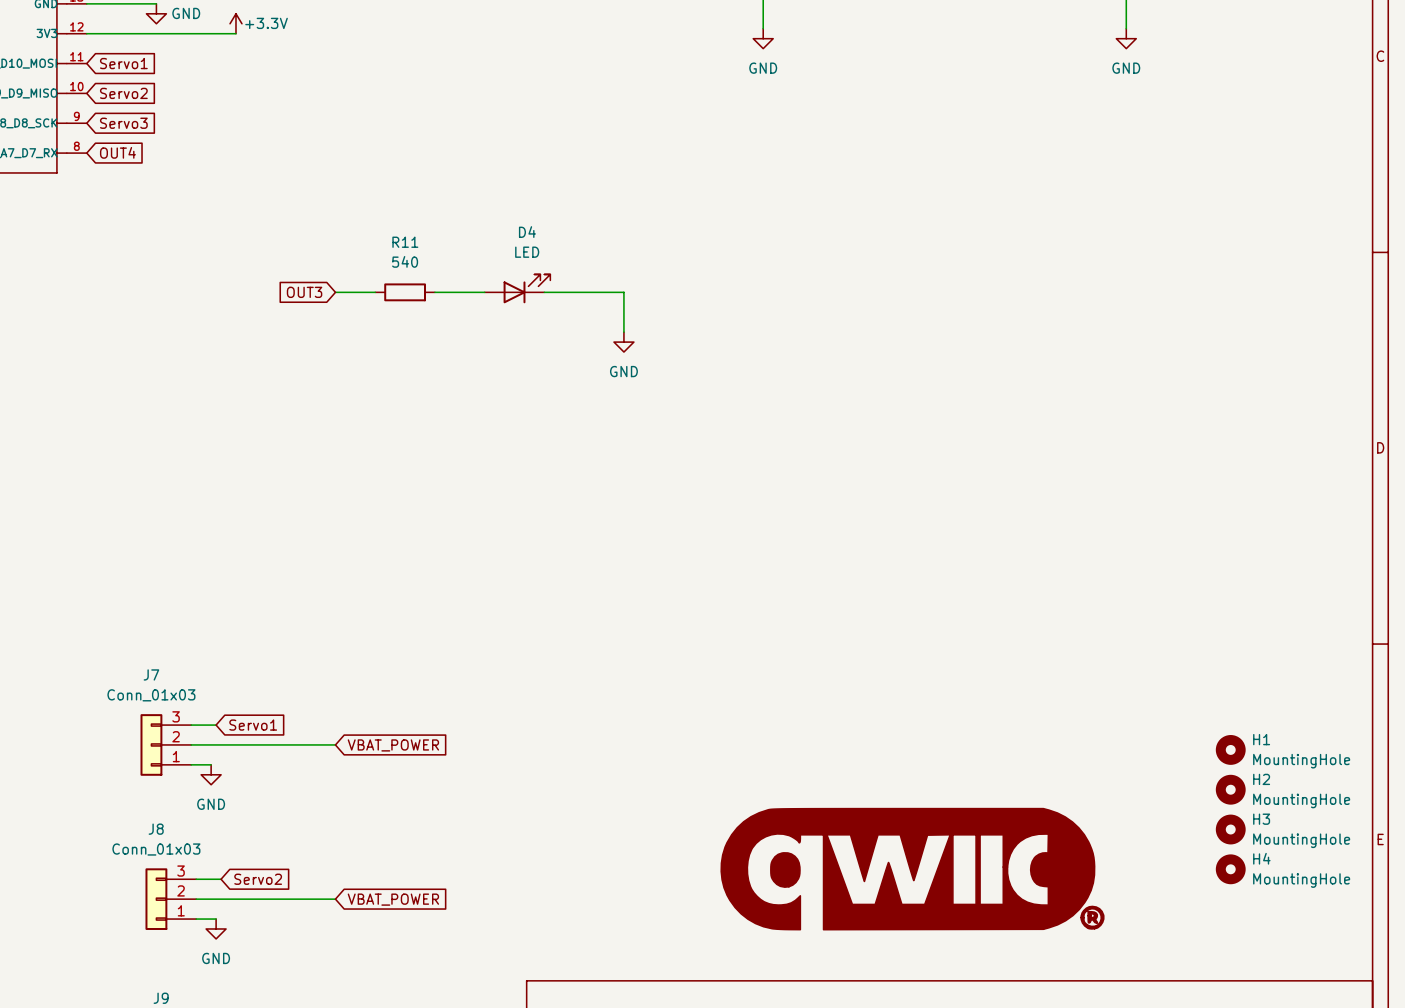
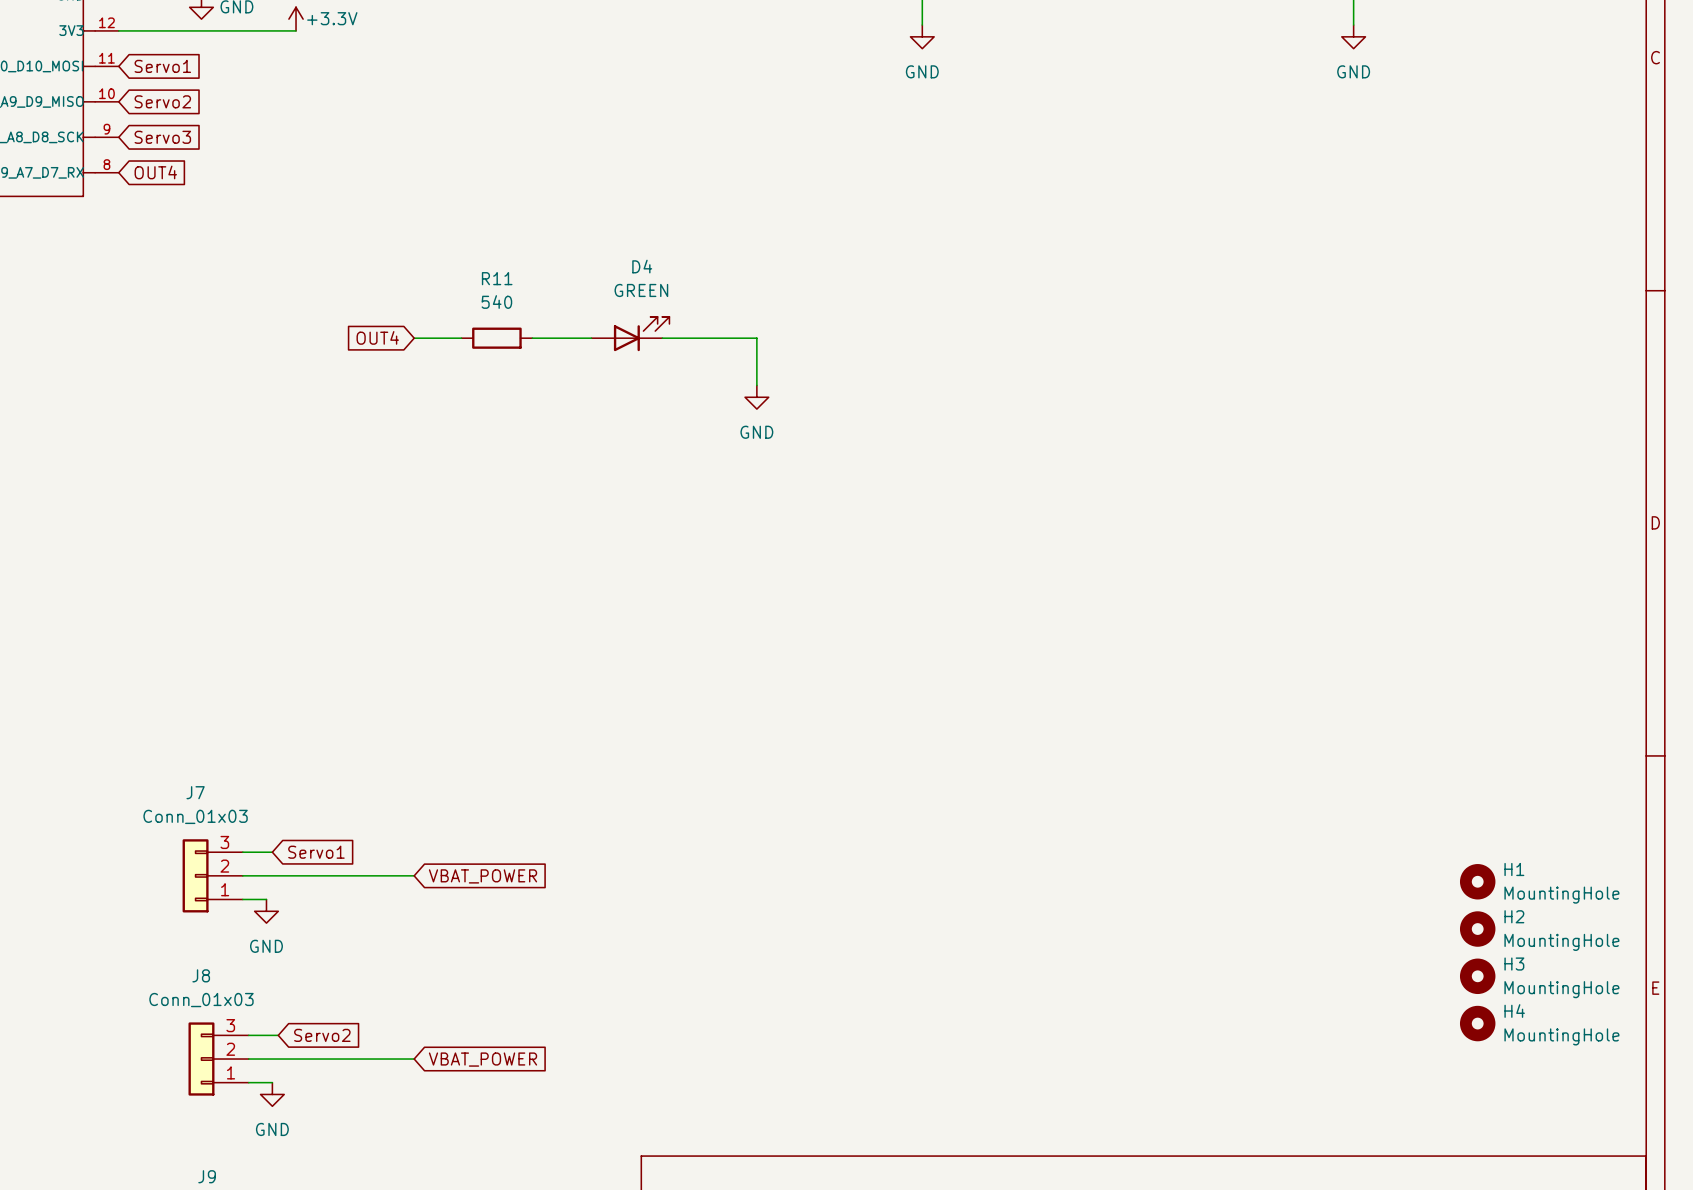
D4 value: LED (527, 252) -> GREEN (641, 290)
global label: OUT3 (304, 292) -> OUT4 (377, 337)
power symbol: (912, 869) -> none

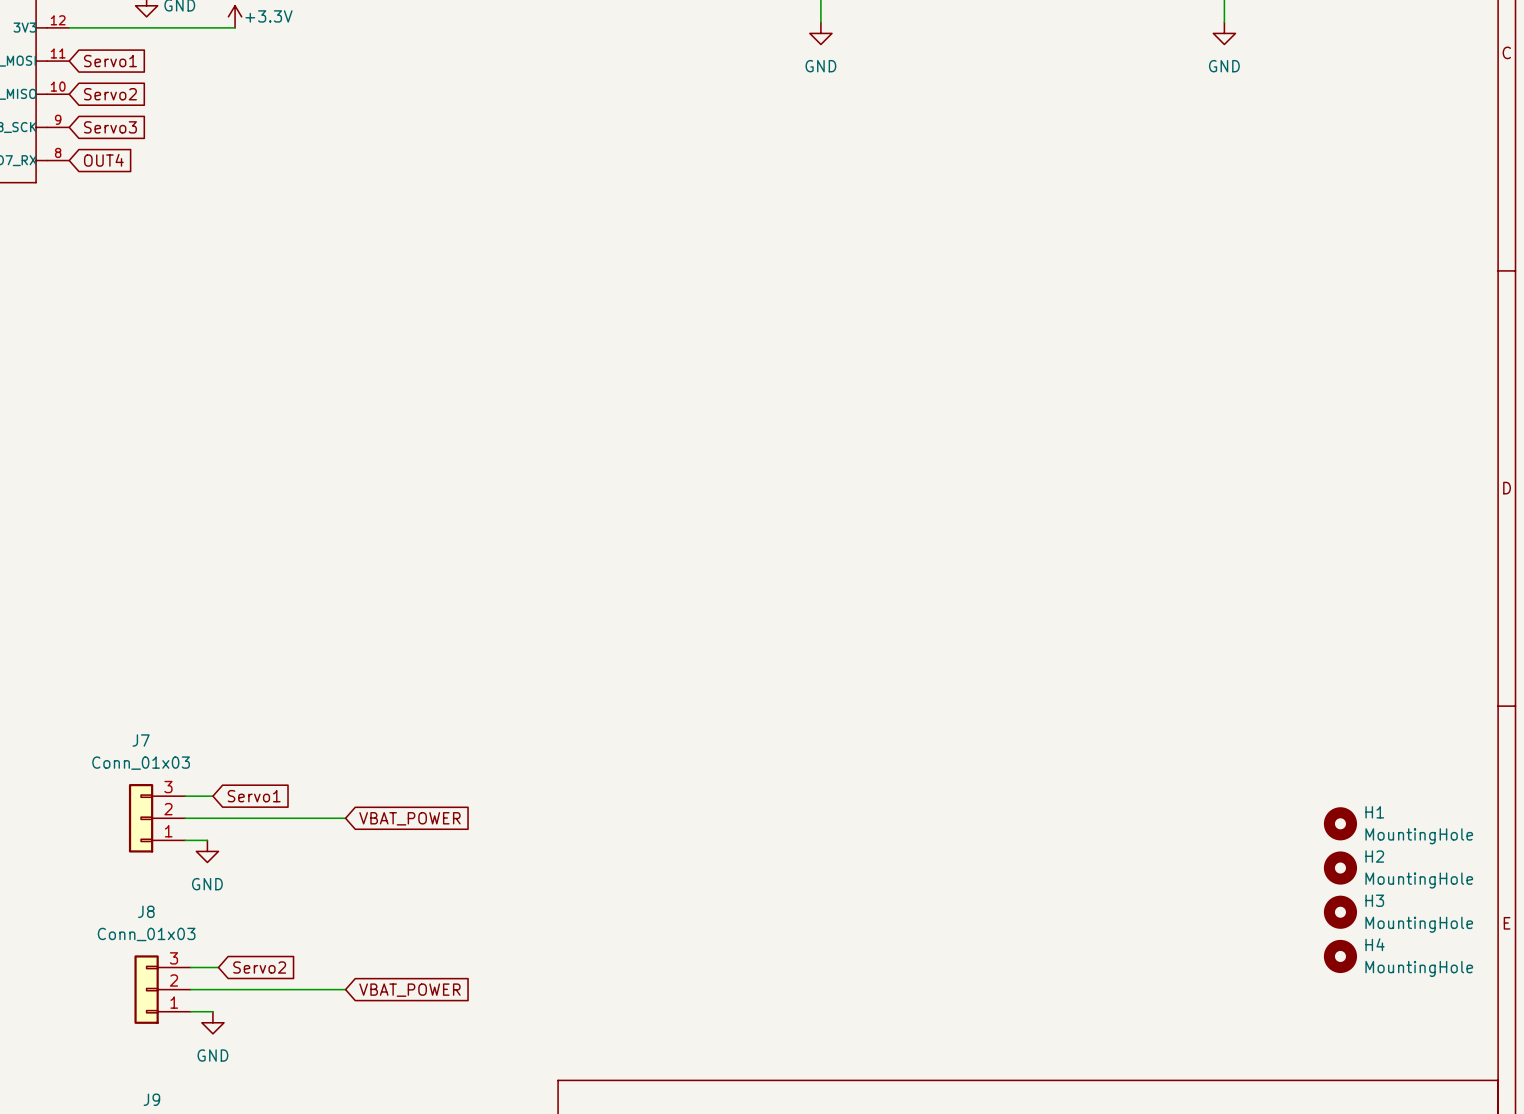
D4: GREEN (630, 334) -> none
global label: OUT4 (377, 337) -> none
wire: (414, 338) (461, 338) -> none
R11: 540 (496, 338) -> none
wire: (532, 338) (591, 338) -> none
wire: (662, 338) (756, 338) (756, 385) -> none
power symbol: GND (756, 397) -> none

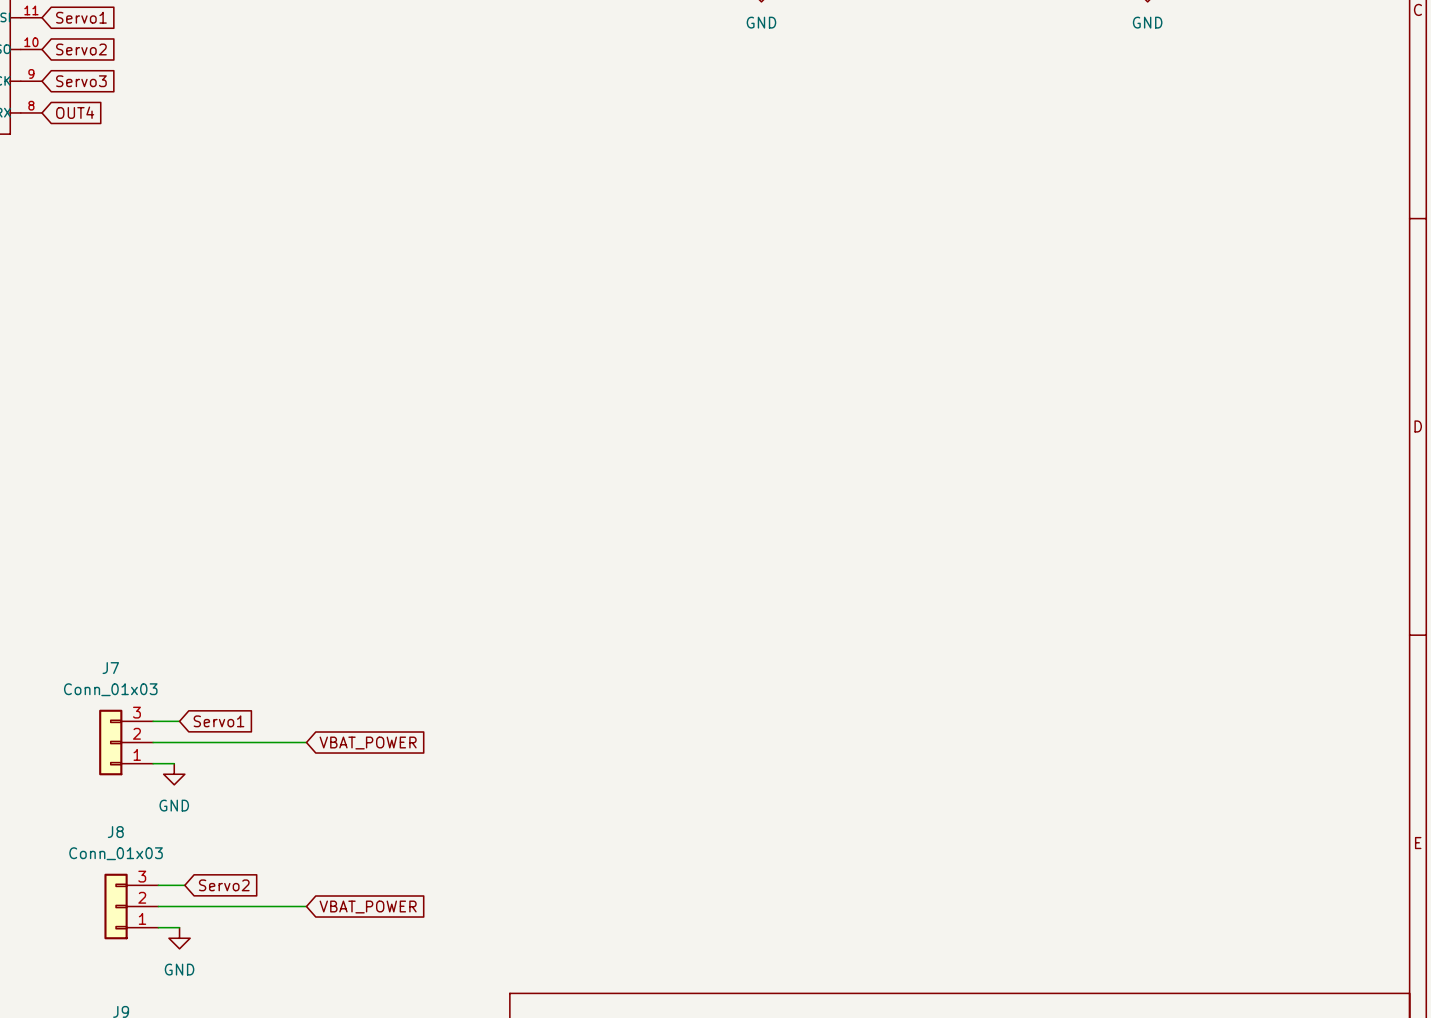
H1: MountingHole (1340, 823) -> none
H2: MountingHole (1340, 868) -> none
H3: MountingHole (1340, 912) -> none
H4: MountingHole (1340, 956) -> none

